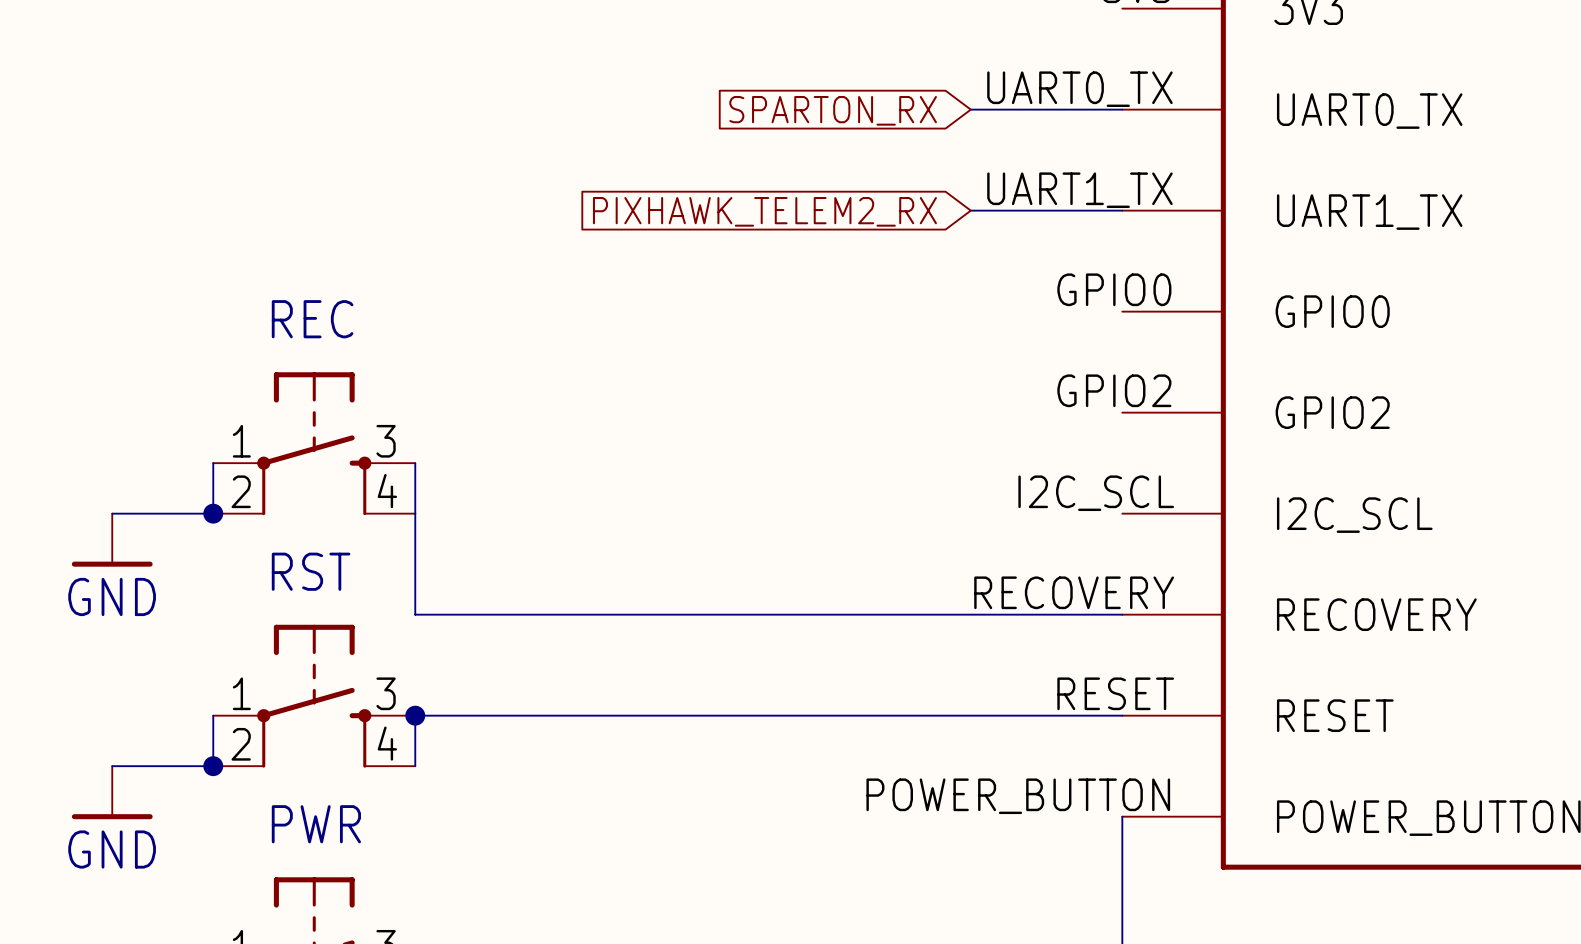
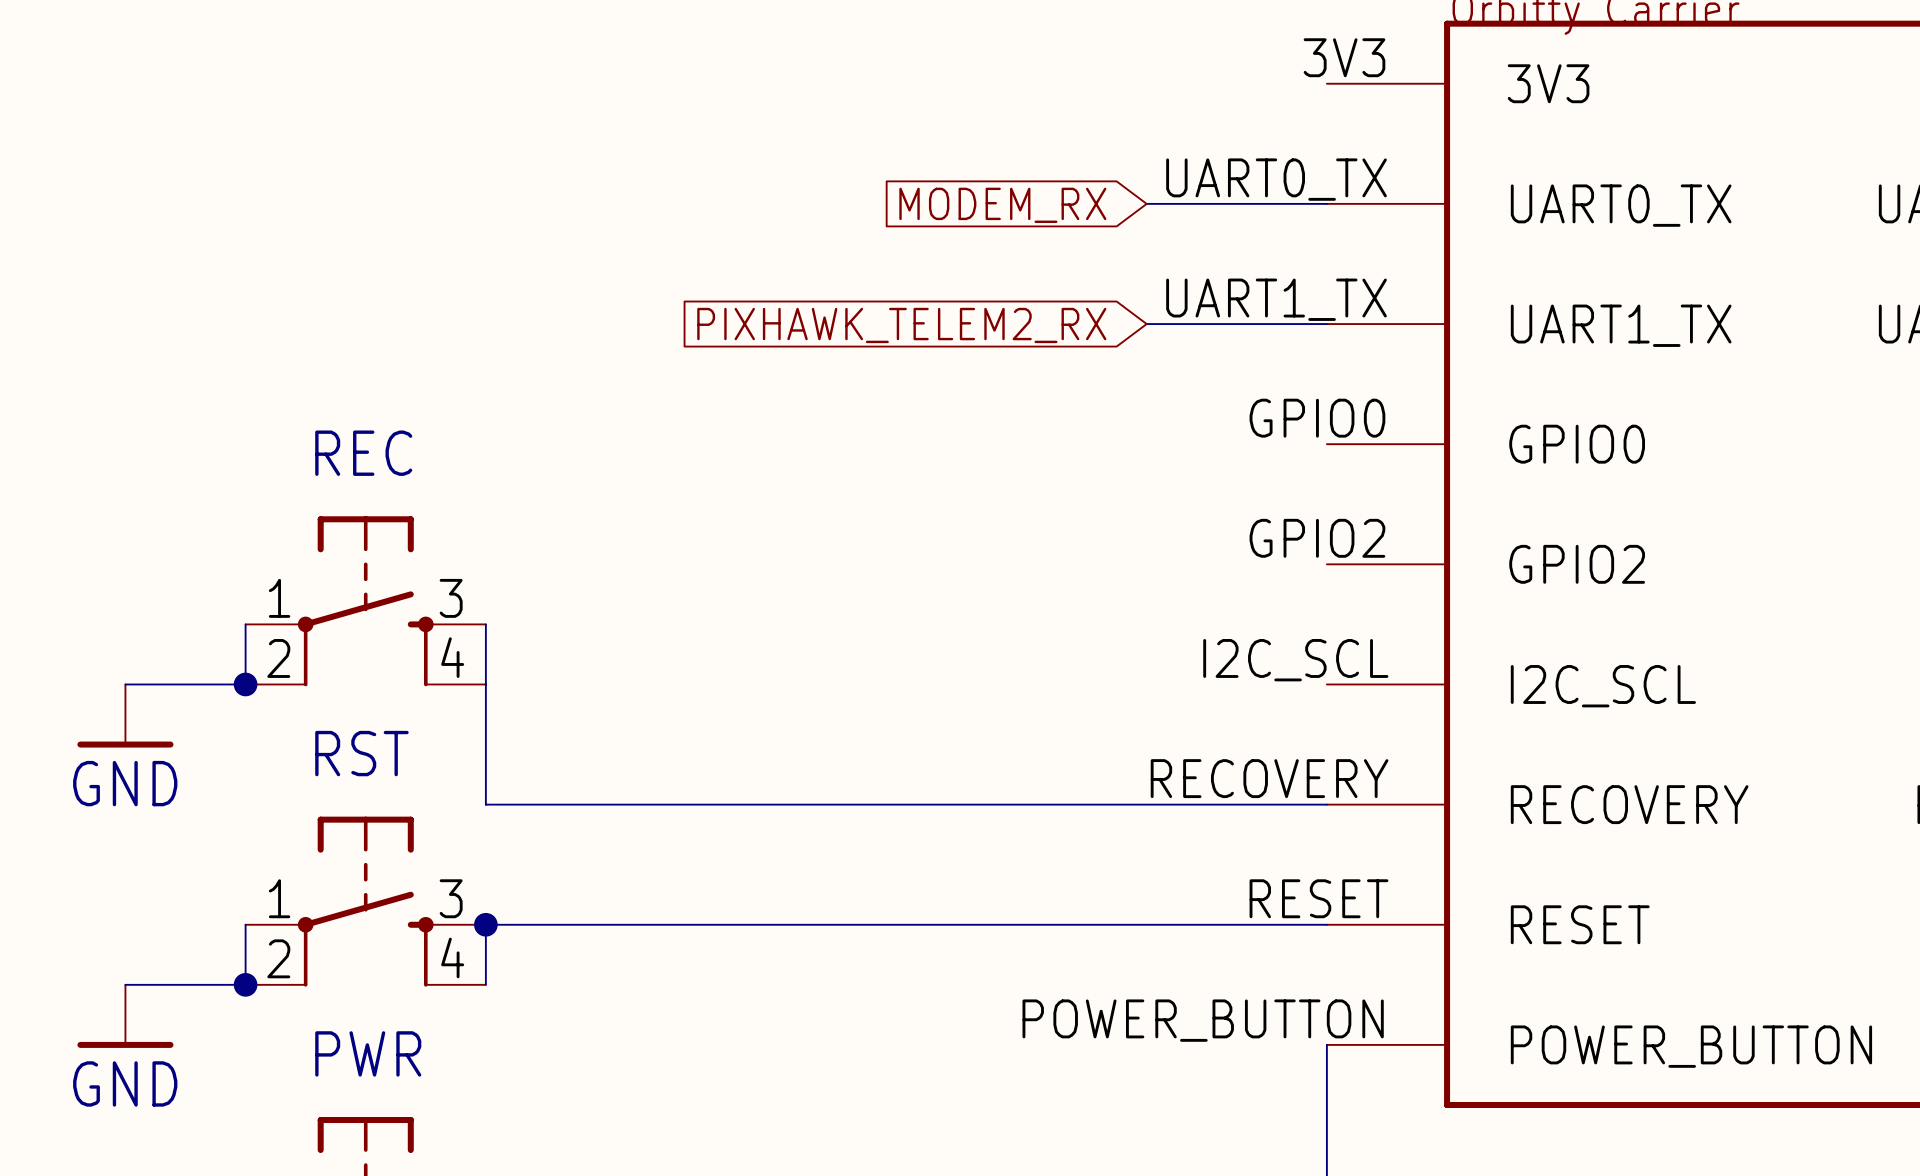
global label: SPARTON_RX (833, 110) -> MODEM_RX (1002, 205)

